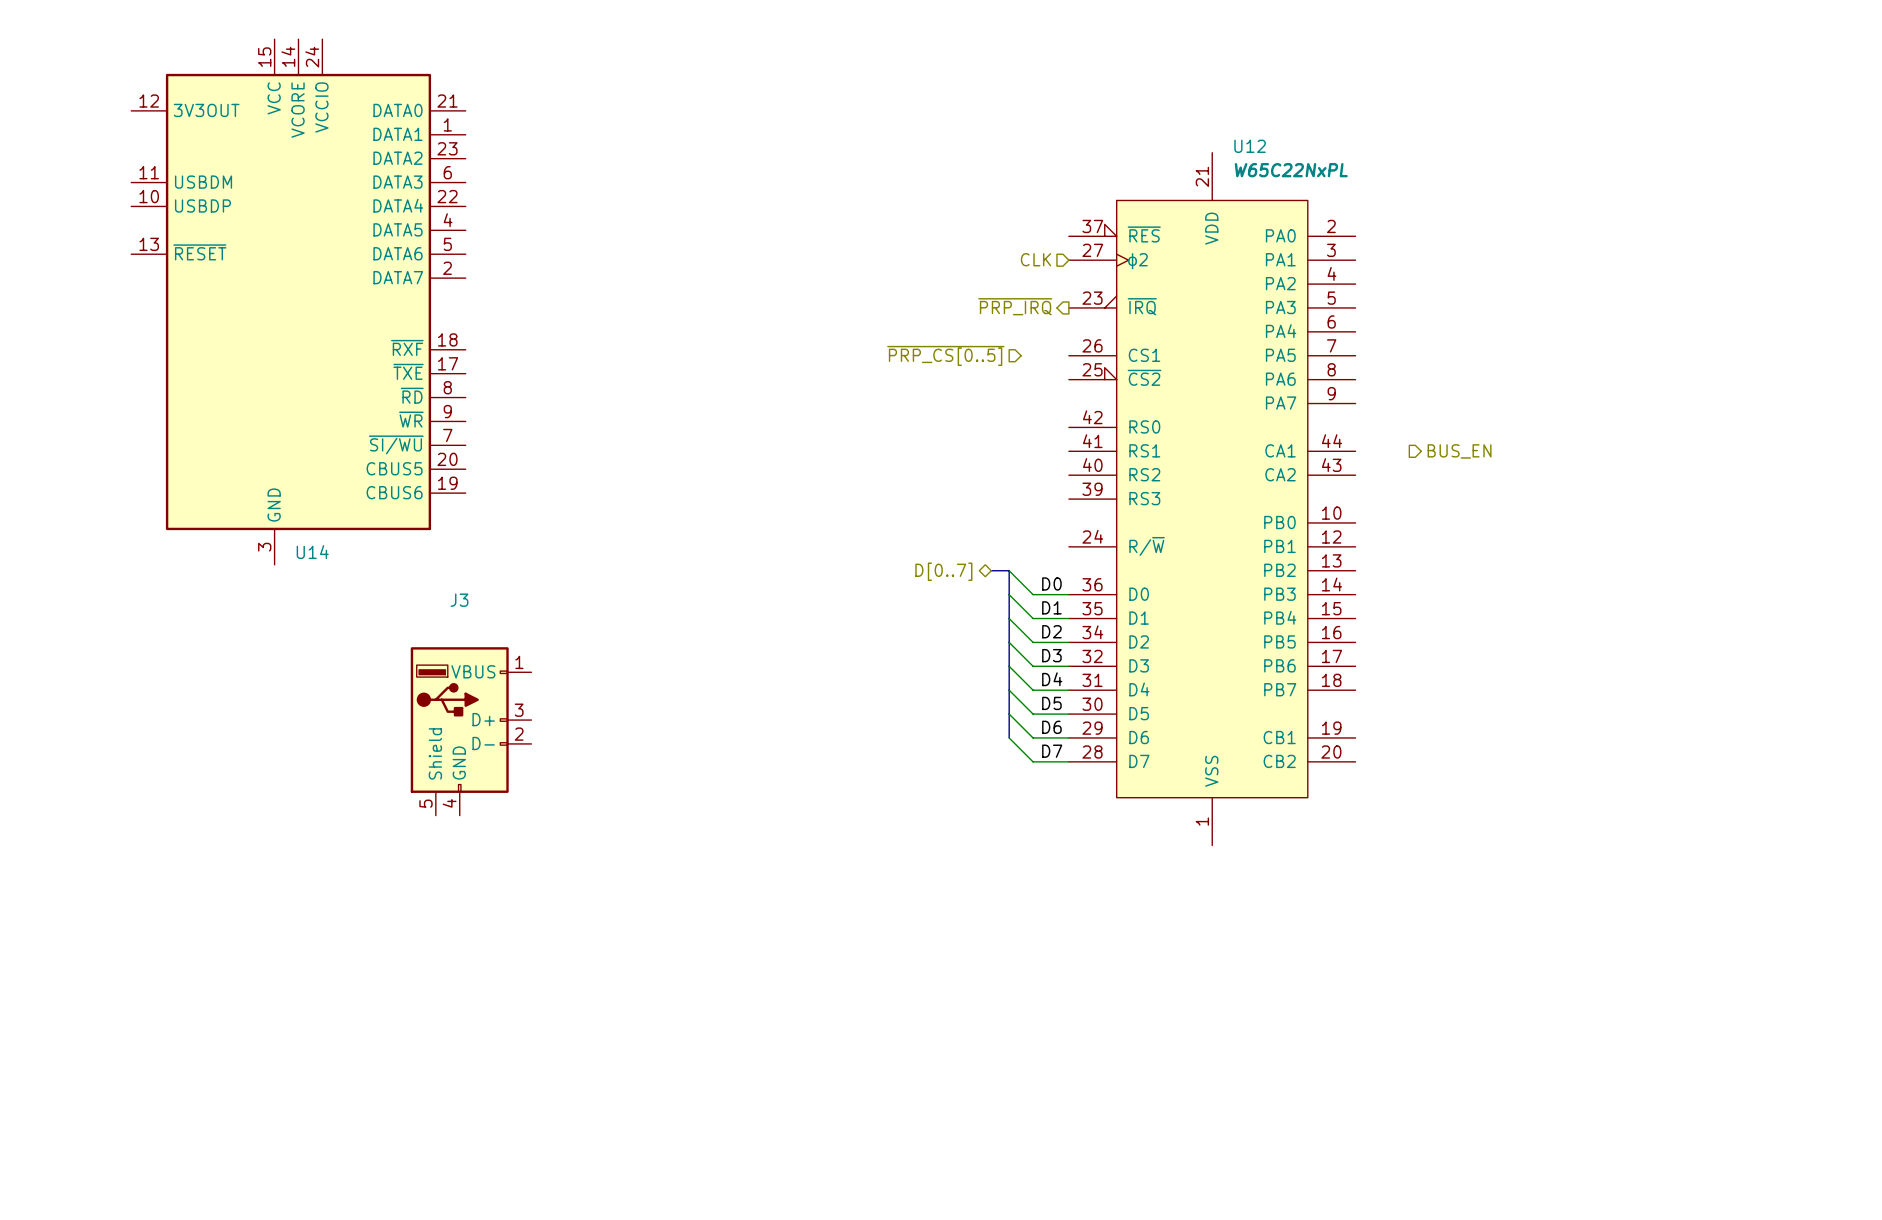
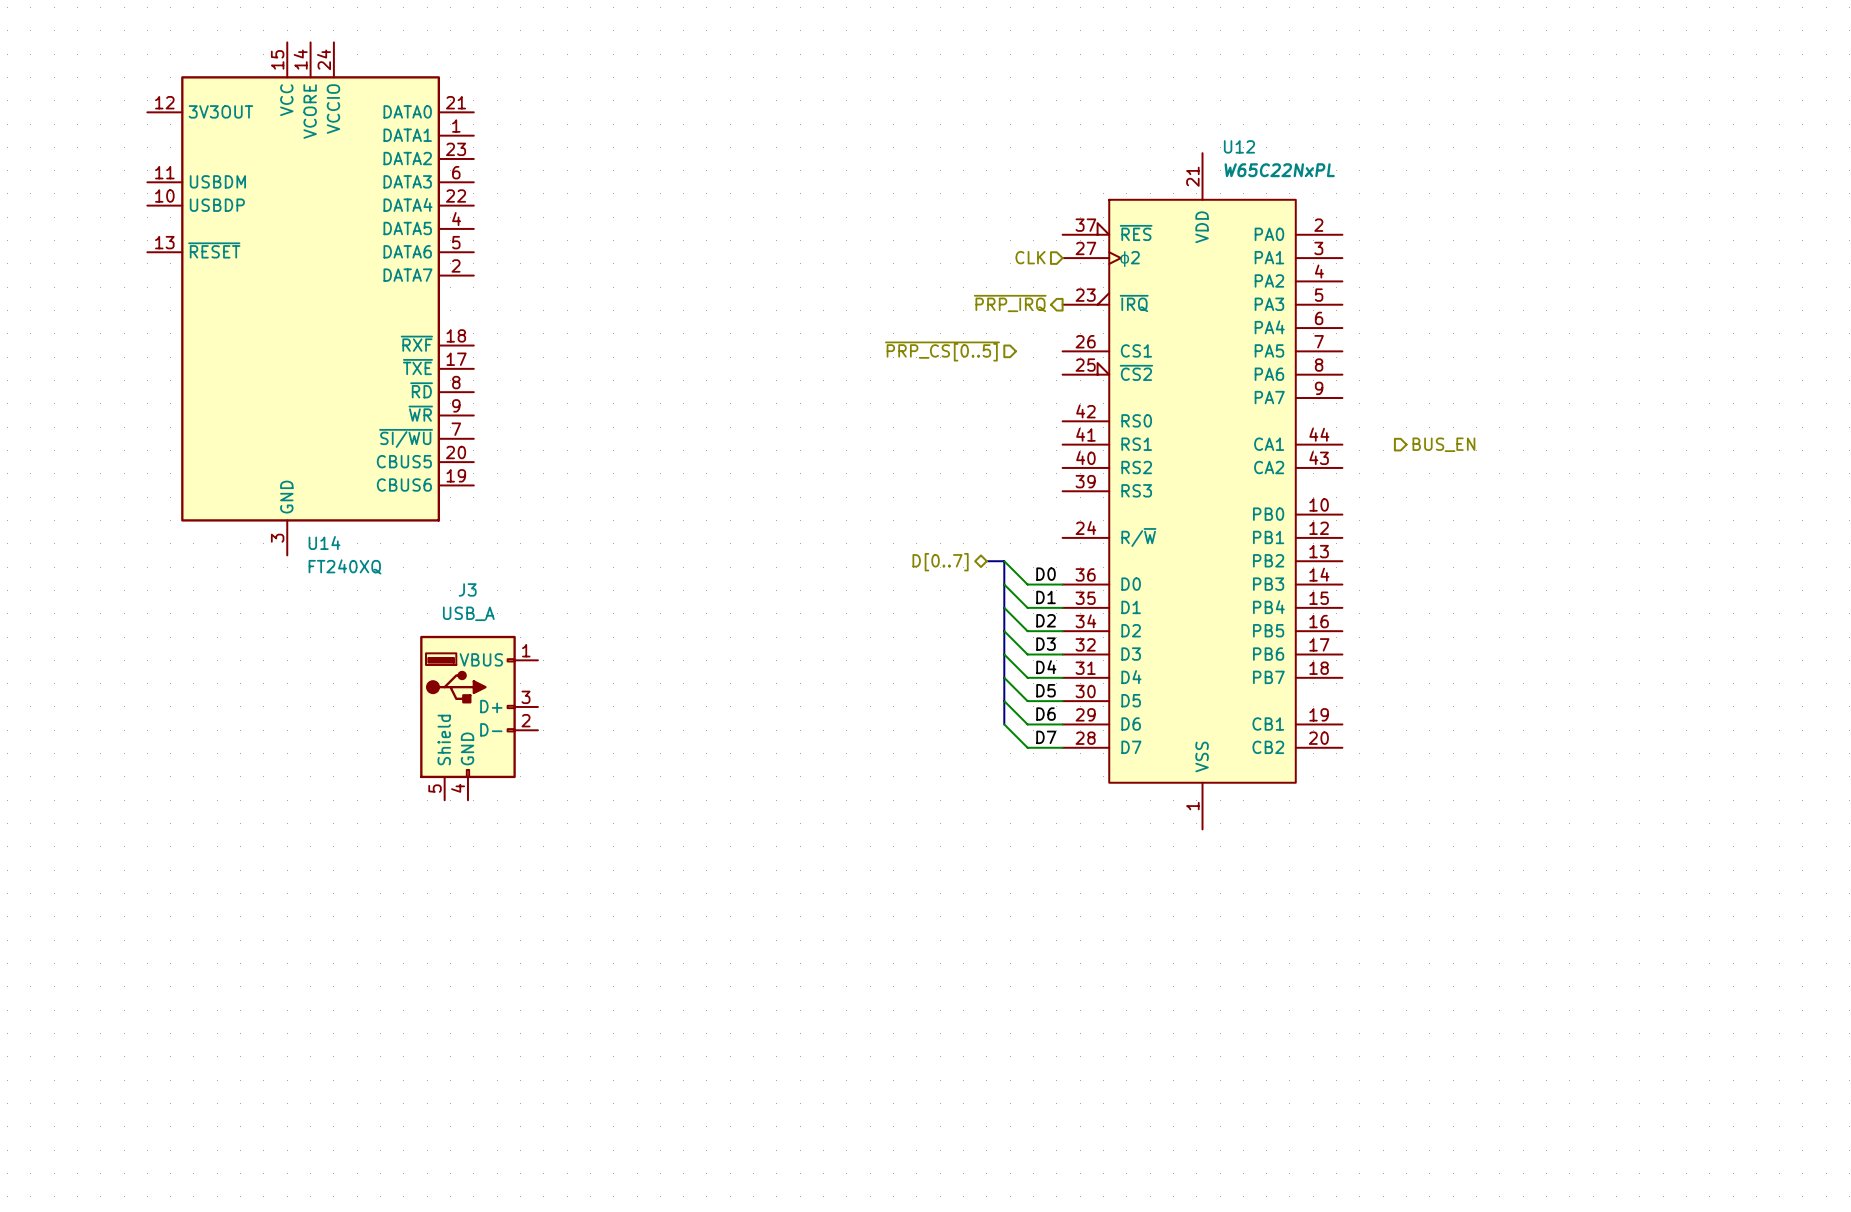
U14 value: none -> FT240XQ (345, 566)
J3 value: none -> USB_A (468, 613)

